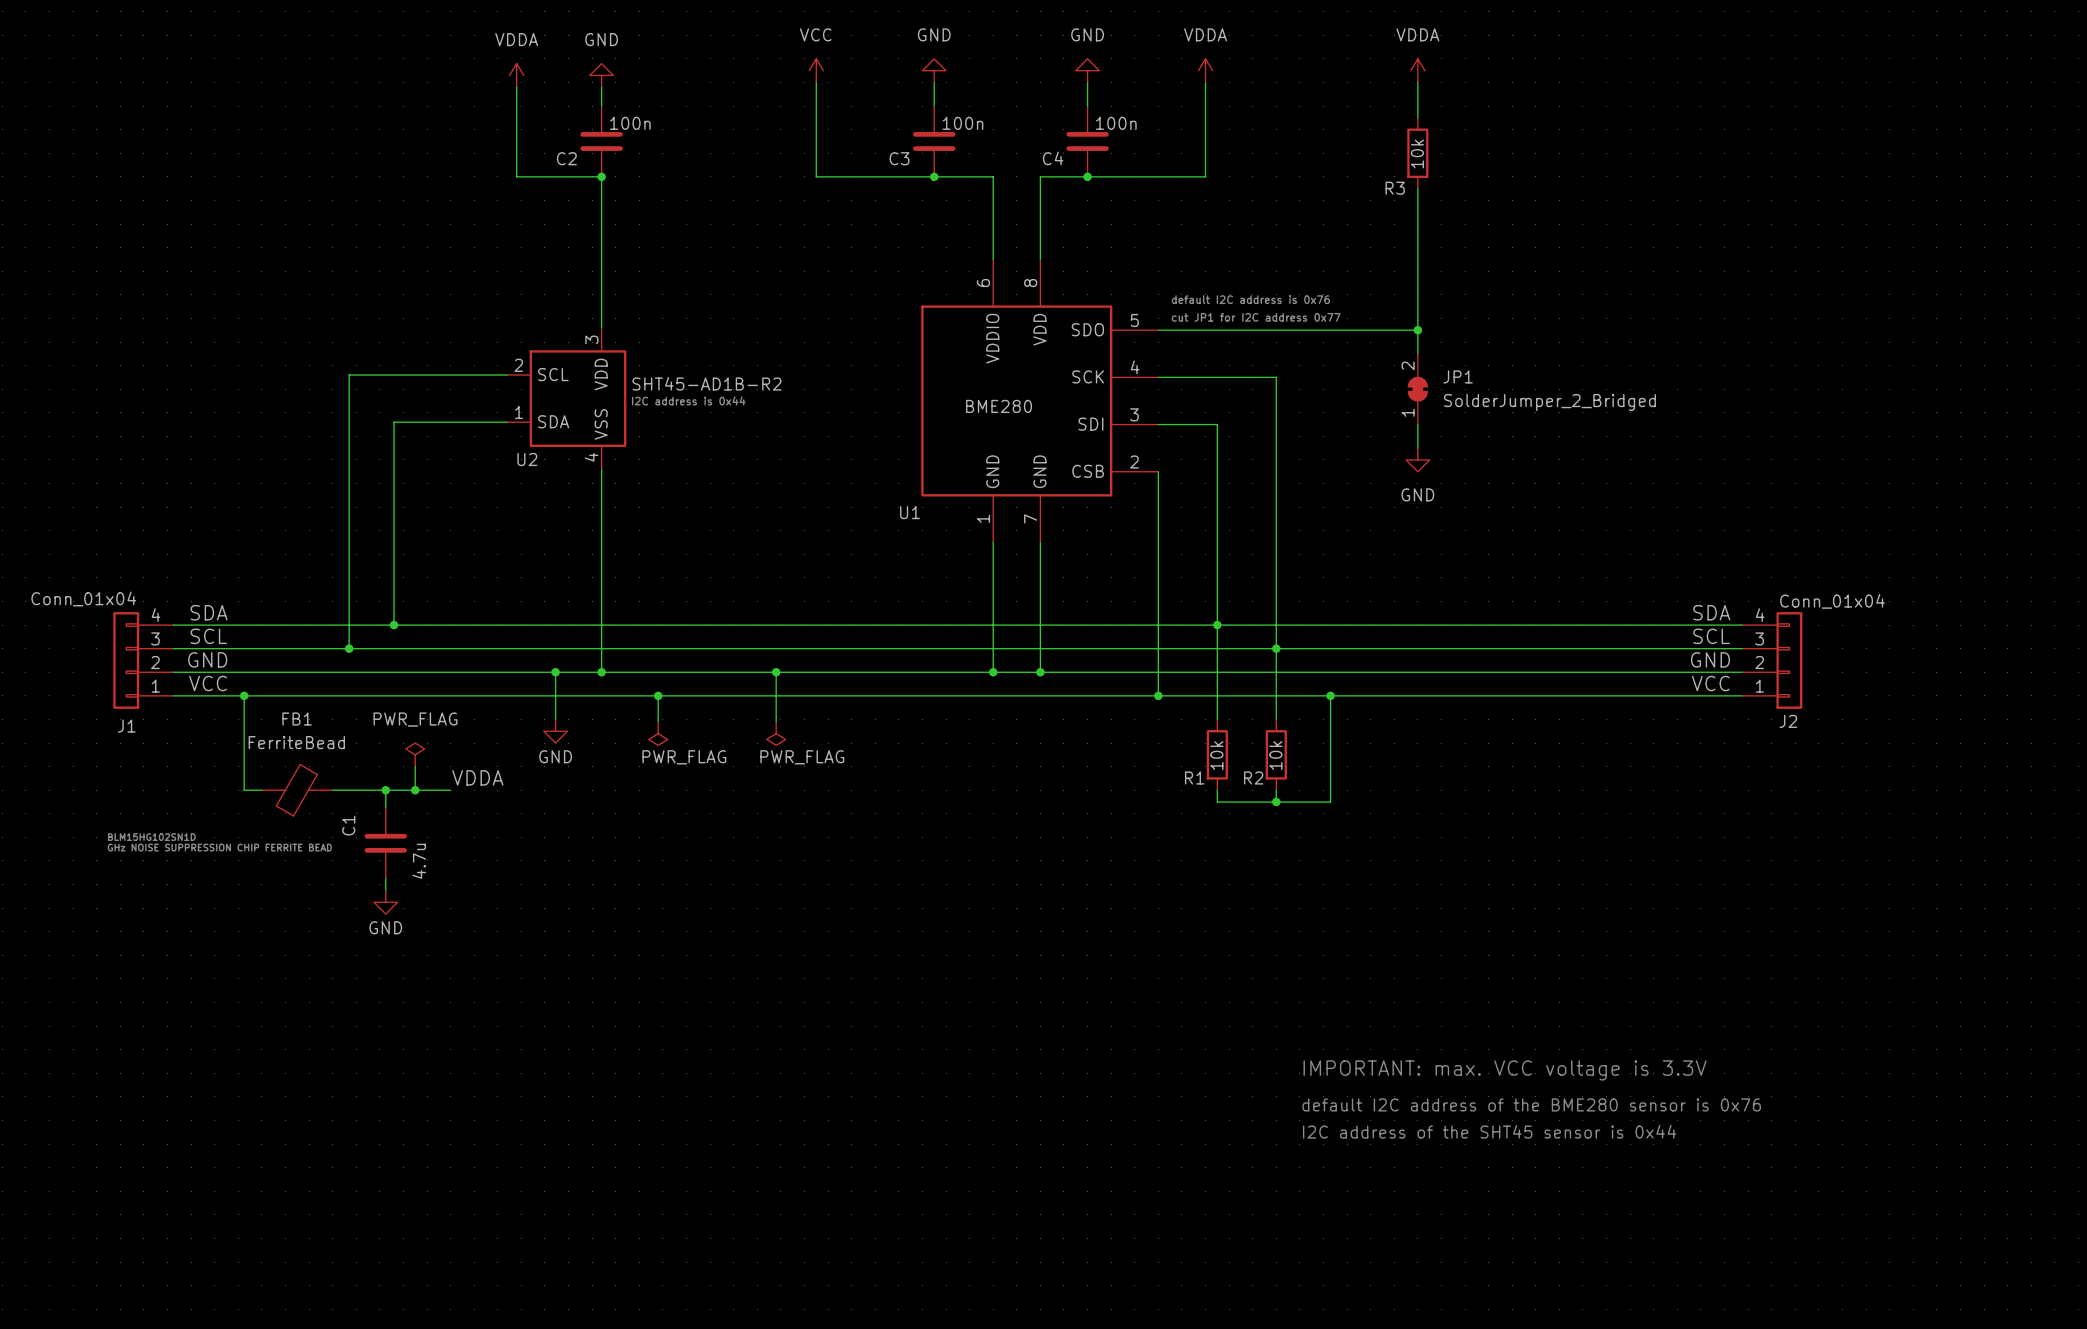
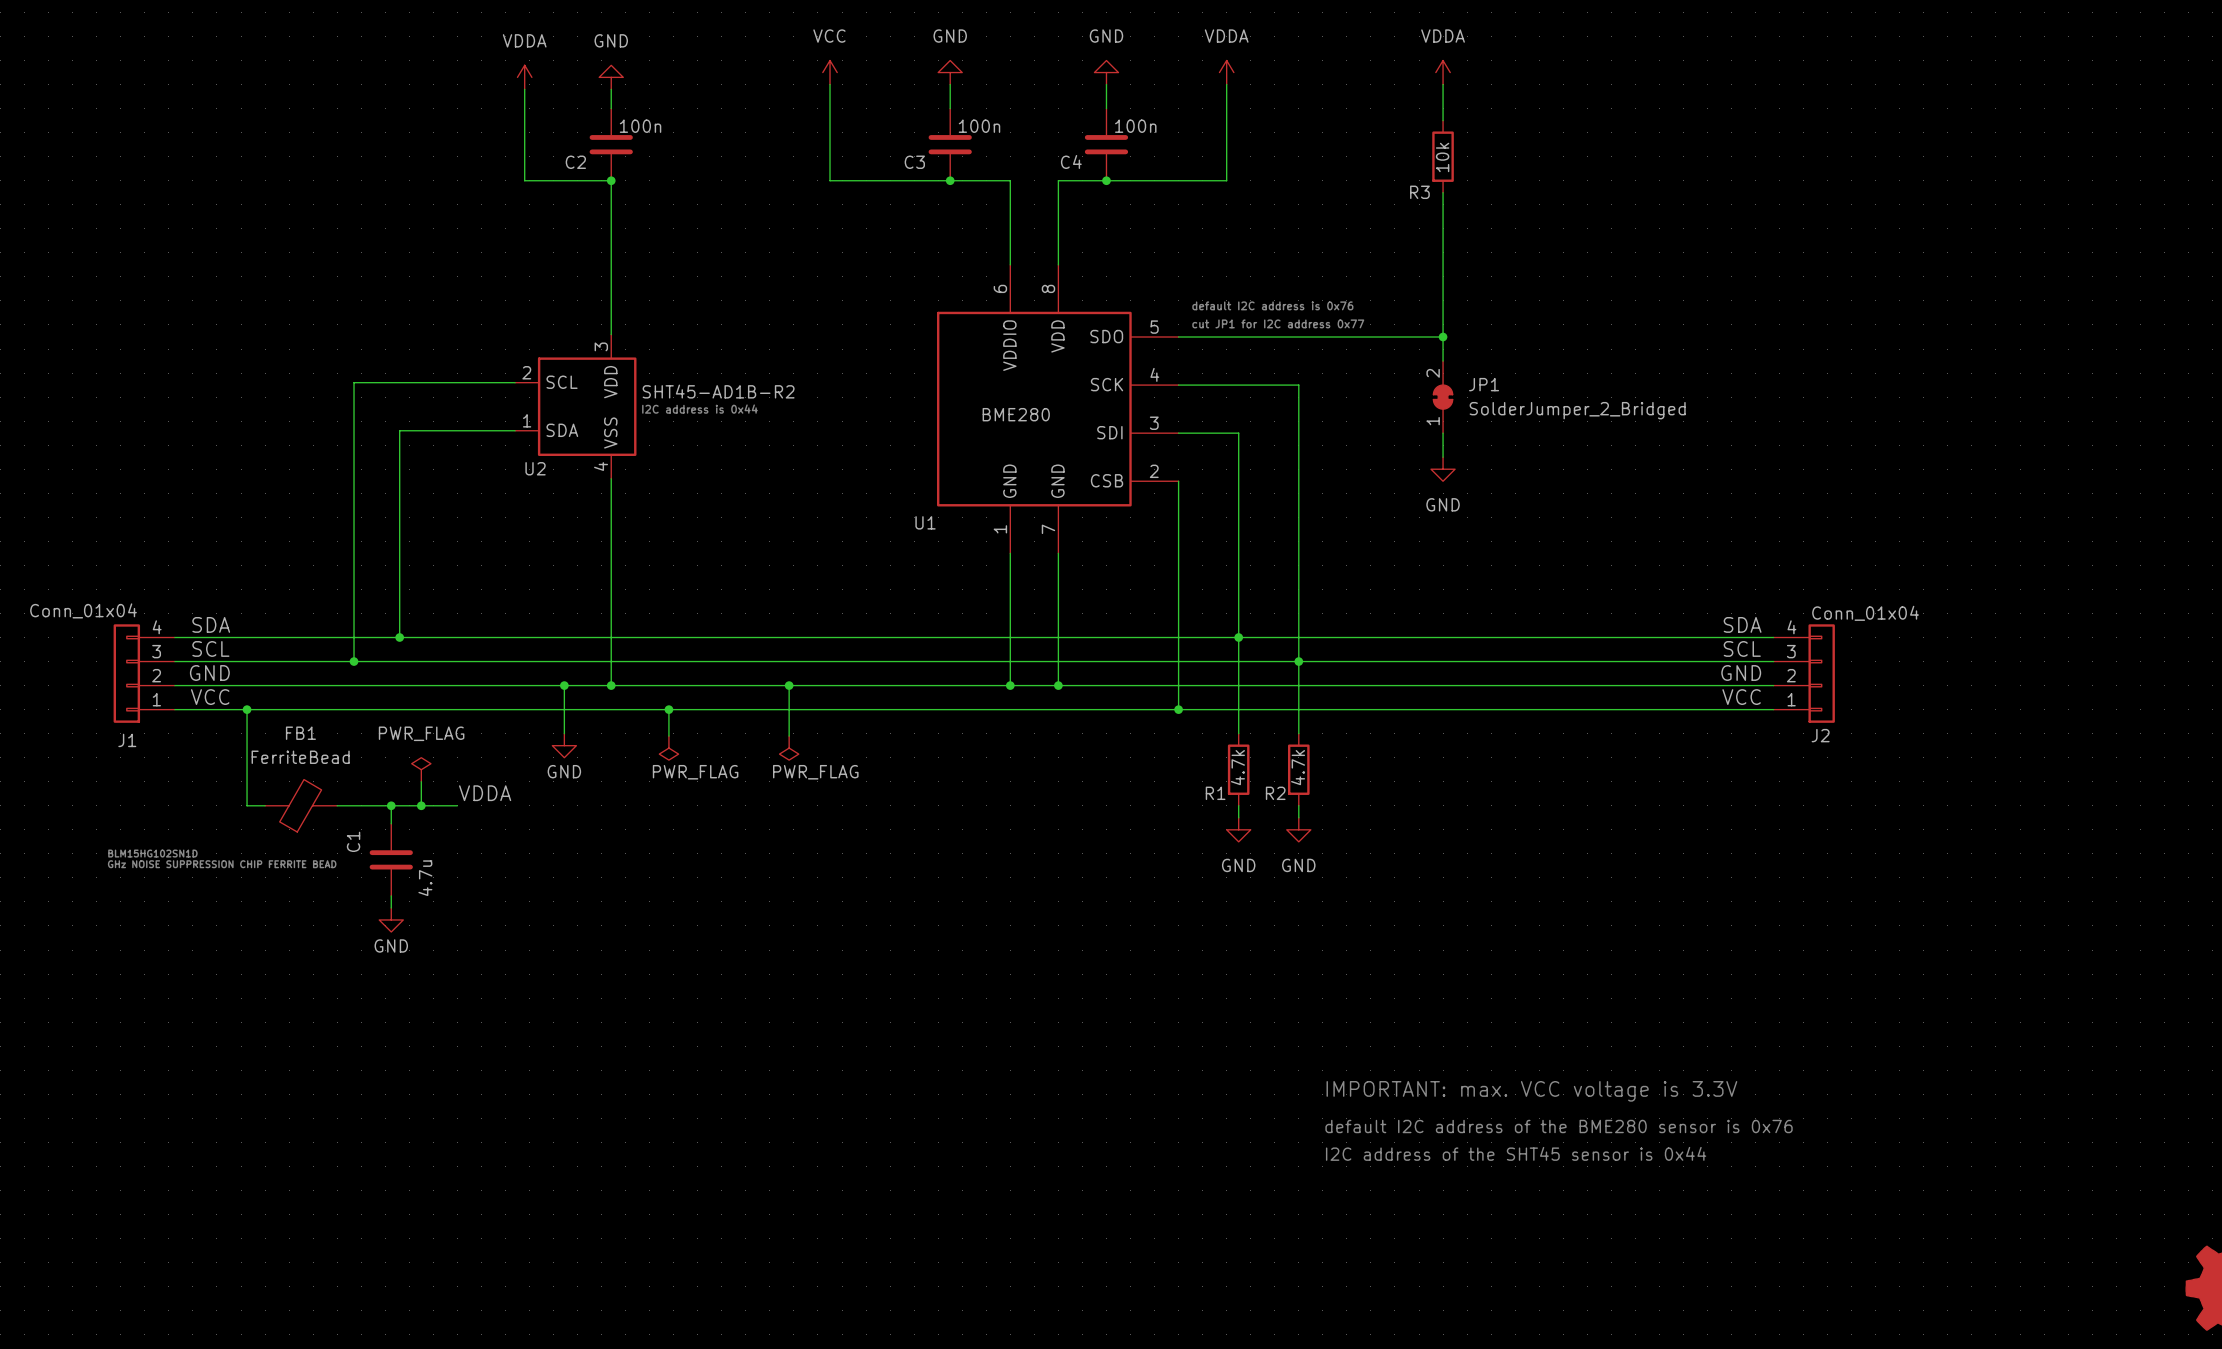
wire: (1330, 695) (1330, 802) (1217, 802) -> none
junction: (1330, 695) -> none
R1 value: 10k (1216, 755) -> 4.7k (1237, 767)
R2 value: 10k (1275, 755) -> 4.7k (1298, 767)
junction: (1276, 802) -> none
power symbol: none -> GND (1238, 829)
power symbol: none -> GND (1298, 829)

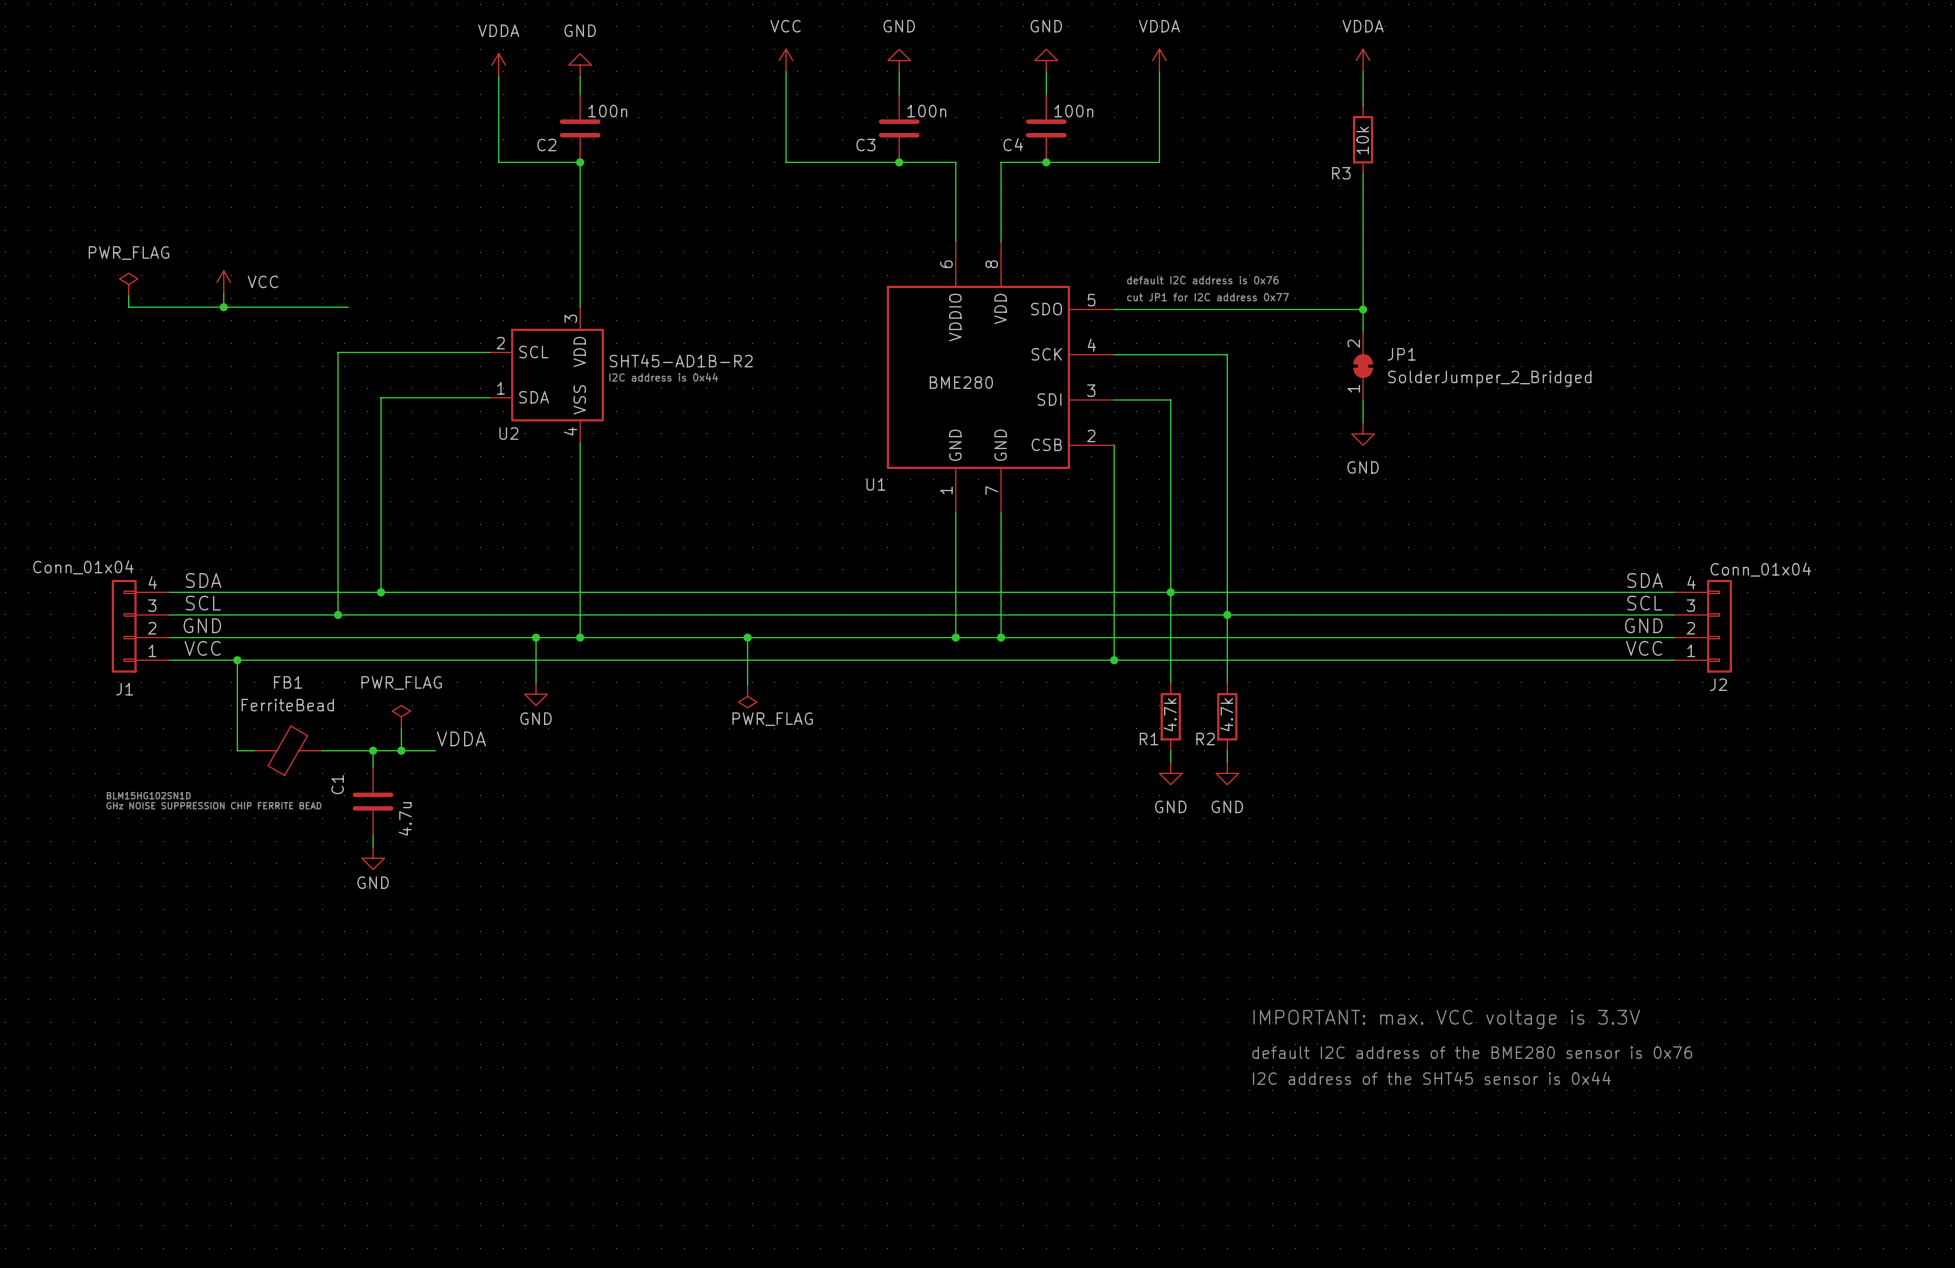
power symbol: none -> VCC (223, 282)
power symbol: none -> PWR_FLAG (128, 284)
wire: none -> (223, 293) (223, 307)
wire: none -> (128, 295) (128, 307) (348, 307)
junction: none -> (223, 307)
wire: (668, 709) (668, 736) -> none
junction: (668, 709) -> none
power symbol: PWR_FLAG (668, 748) -> none

